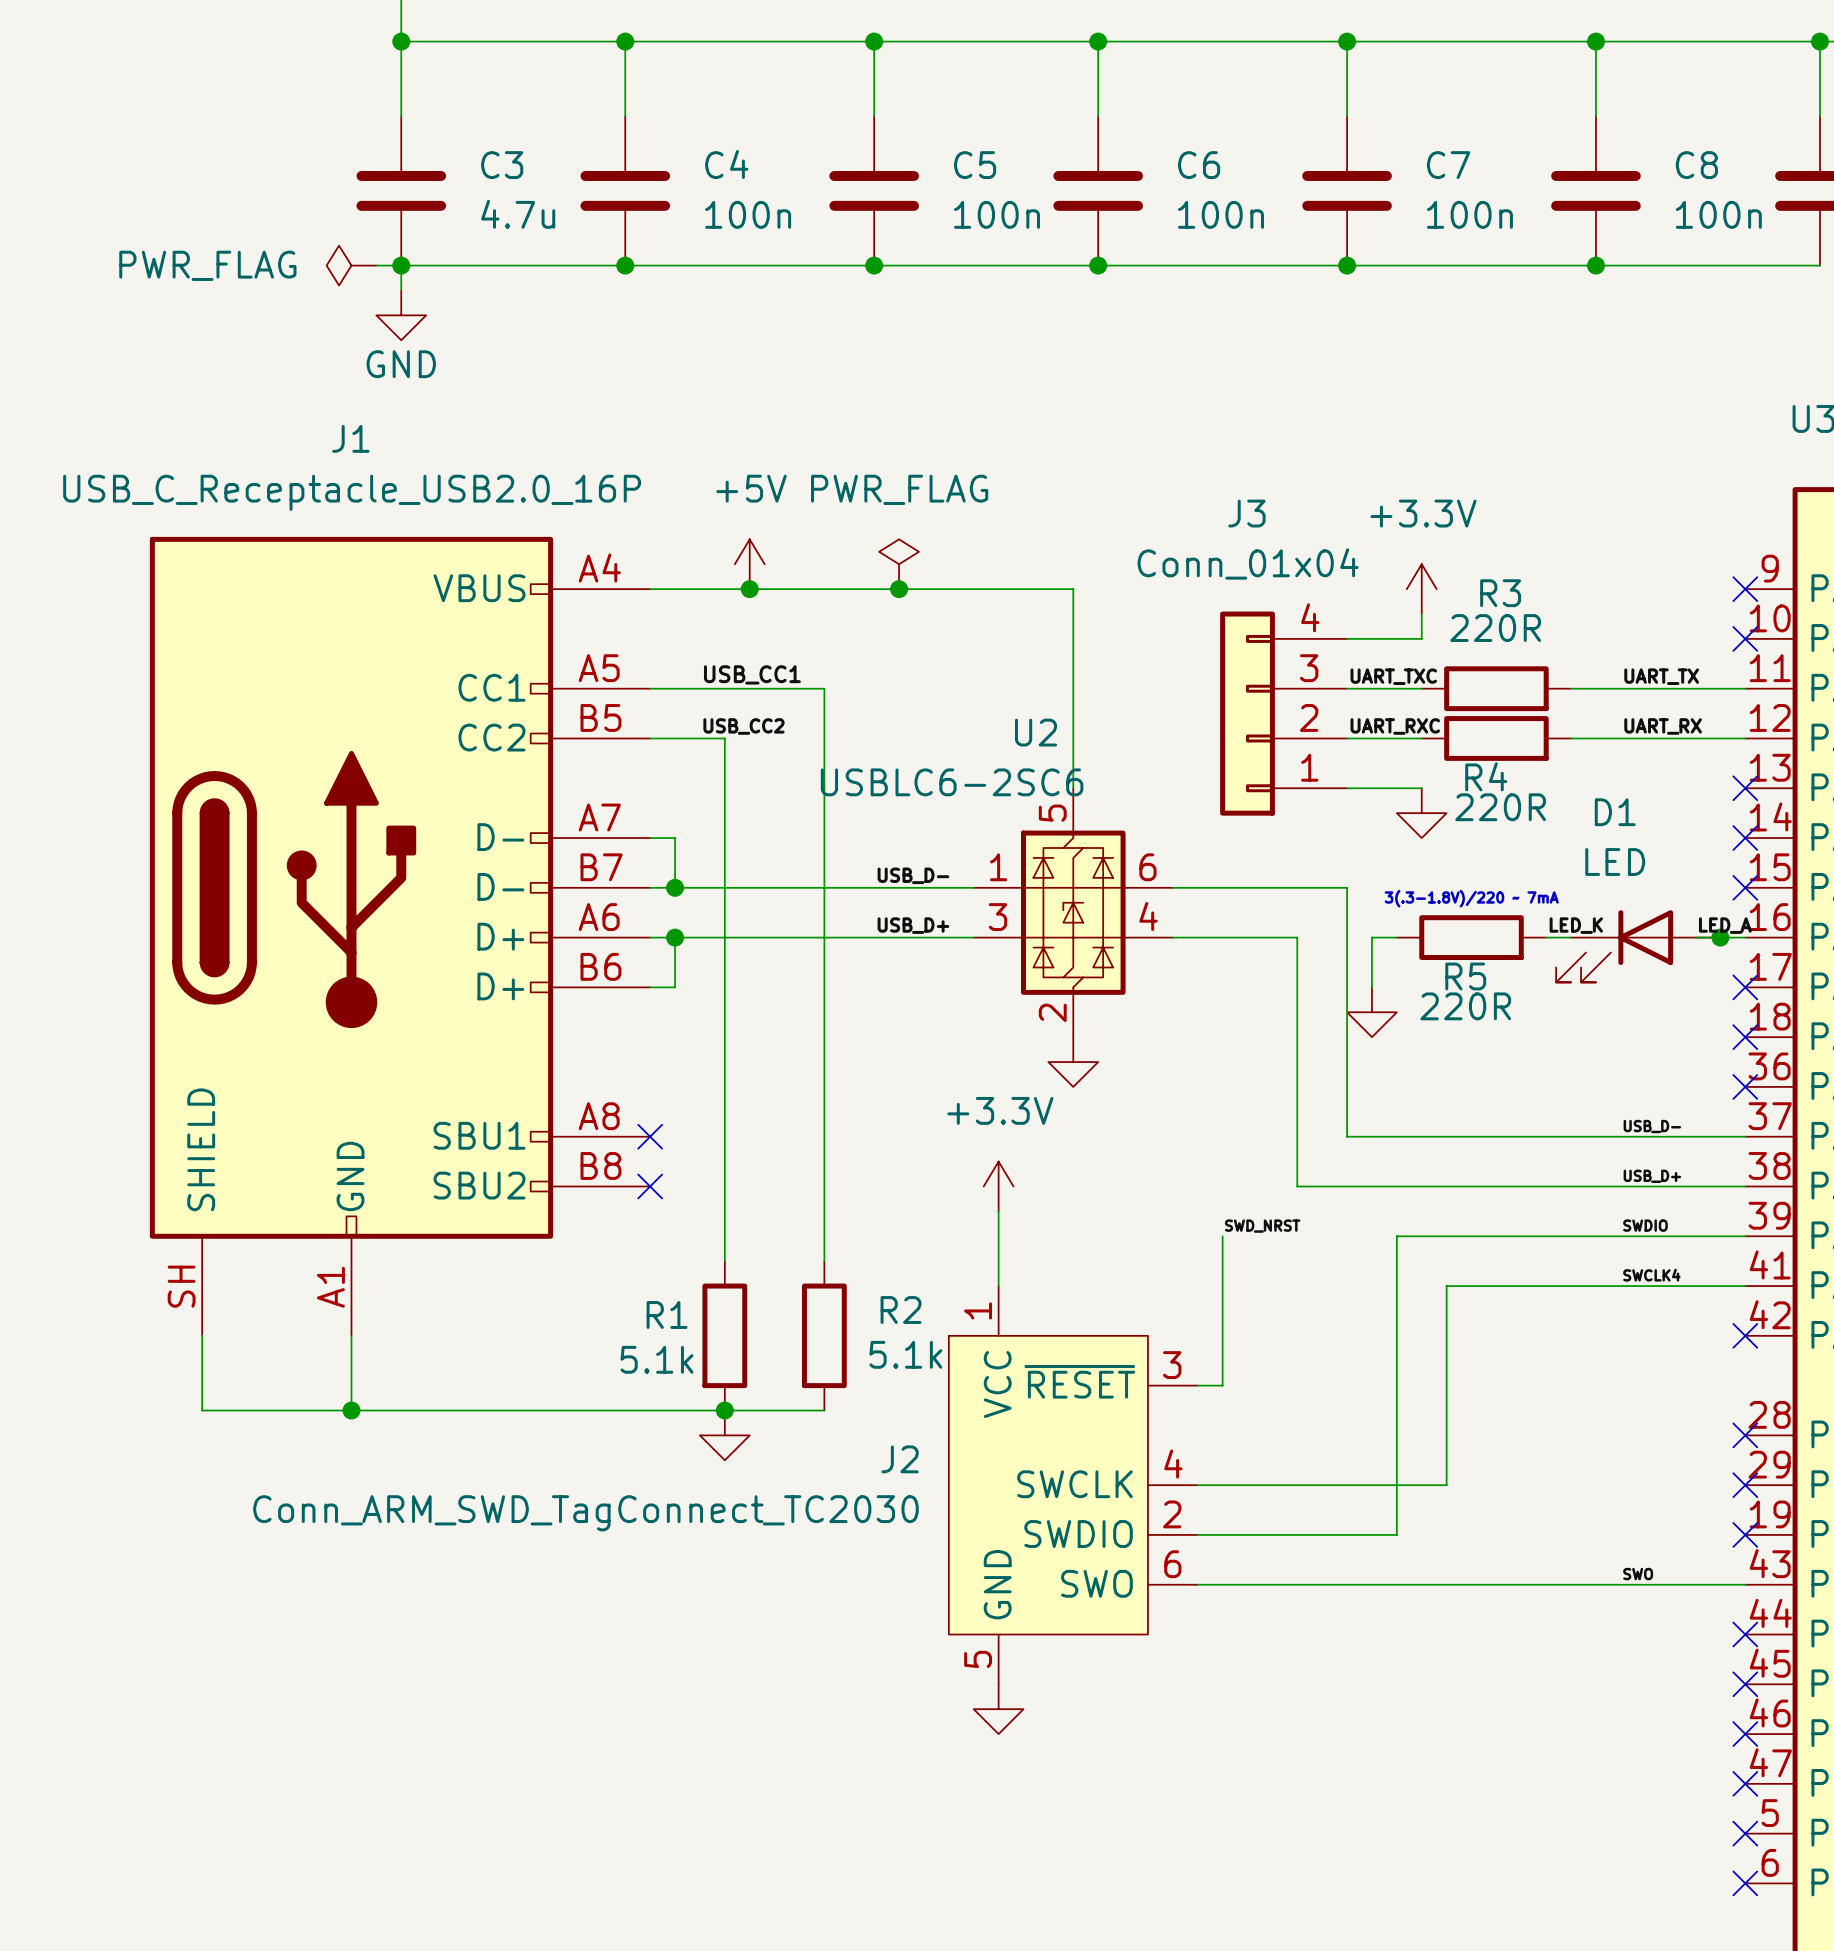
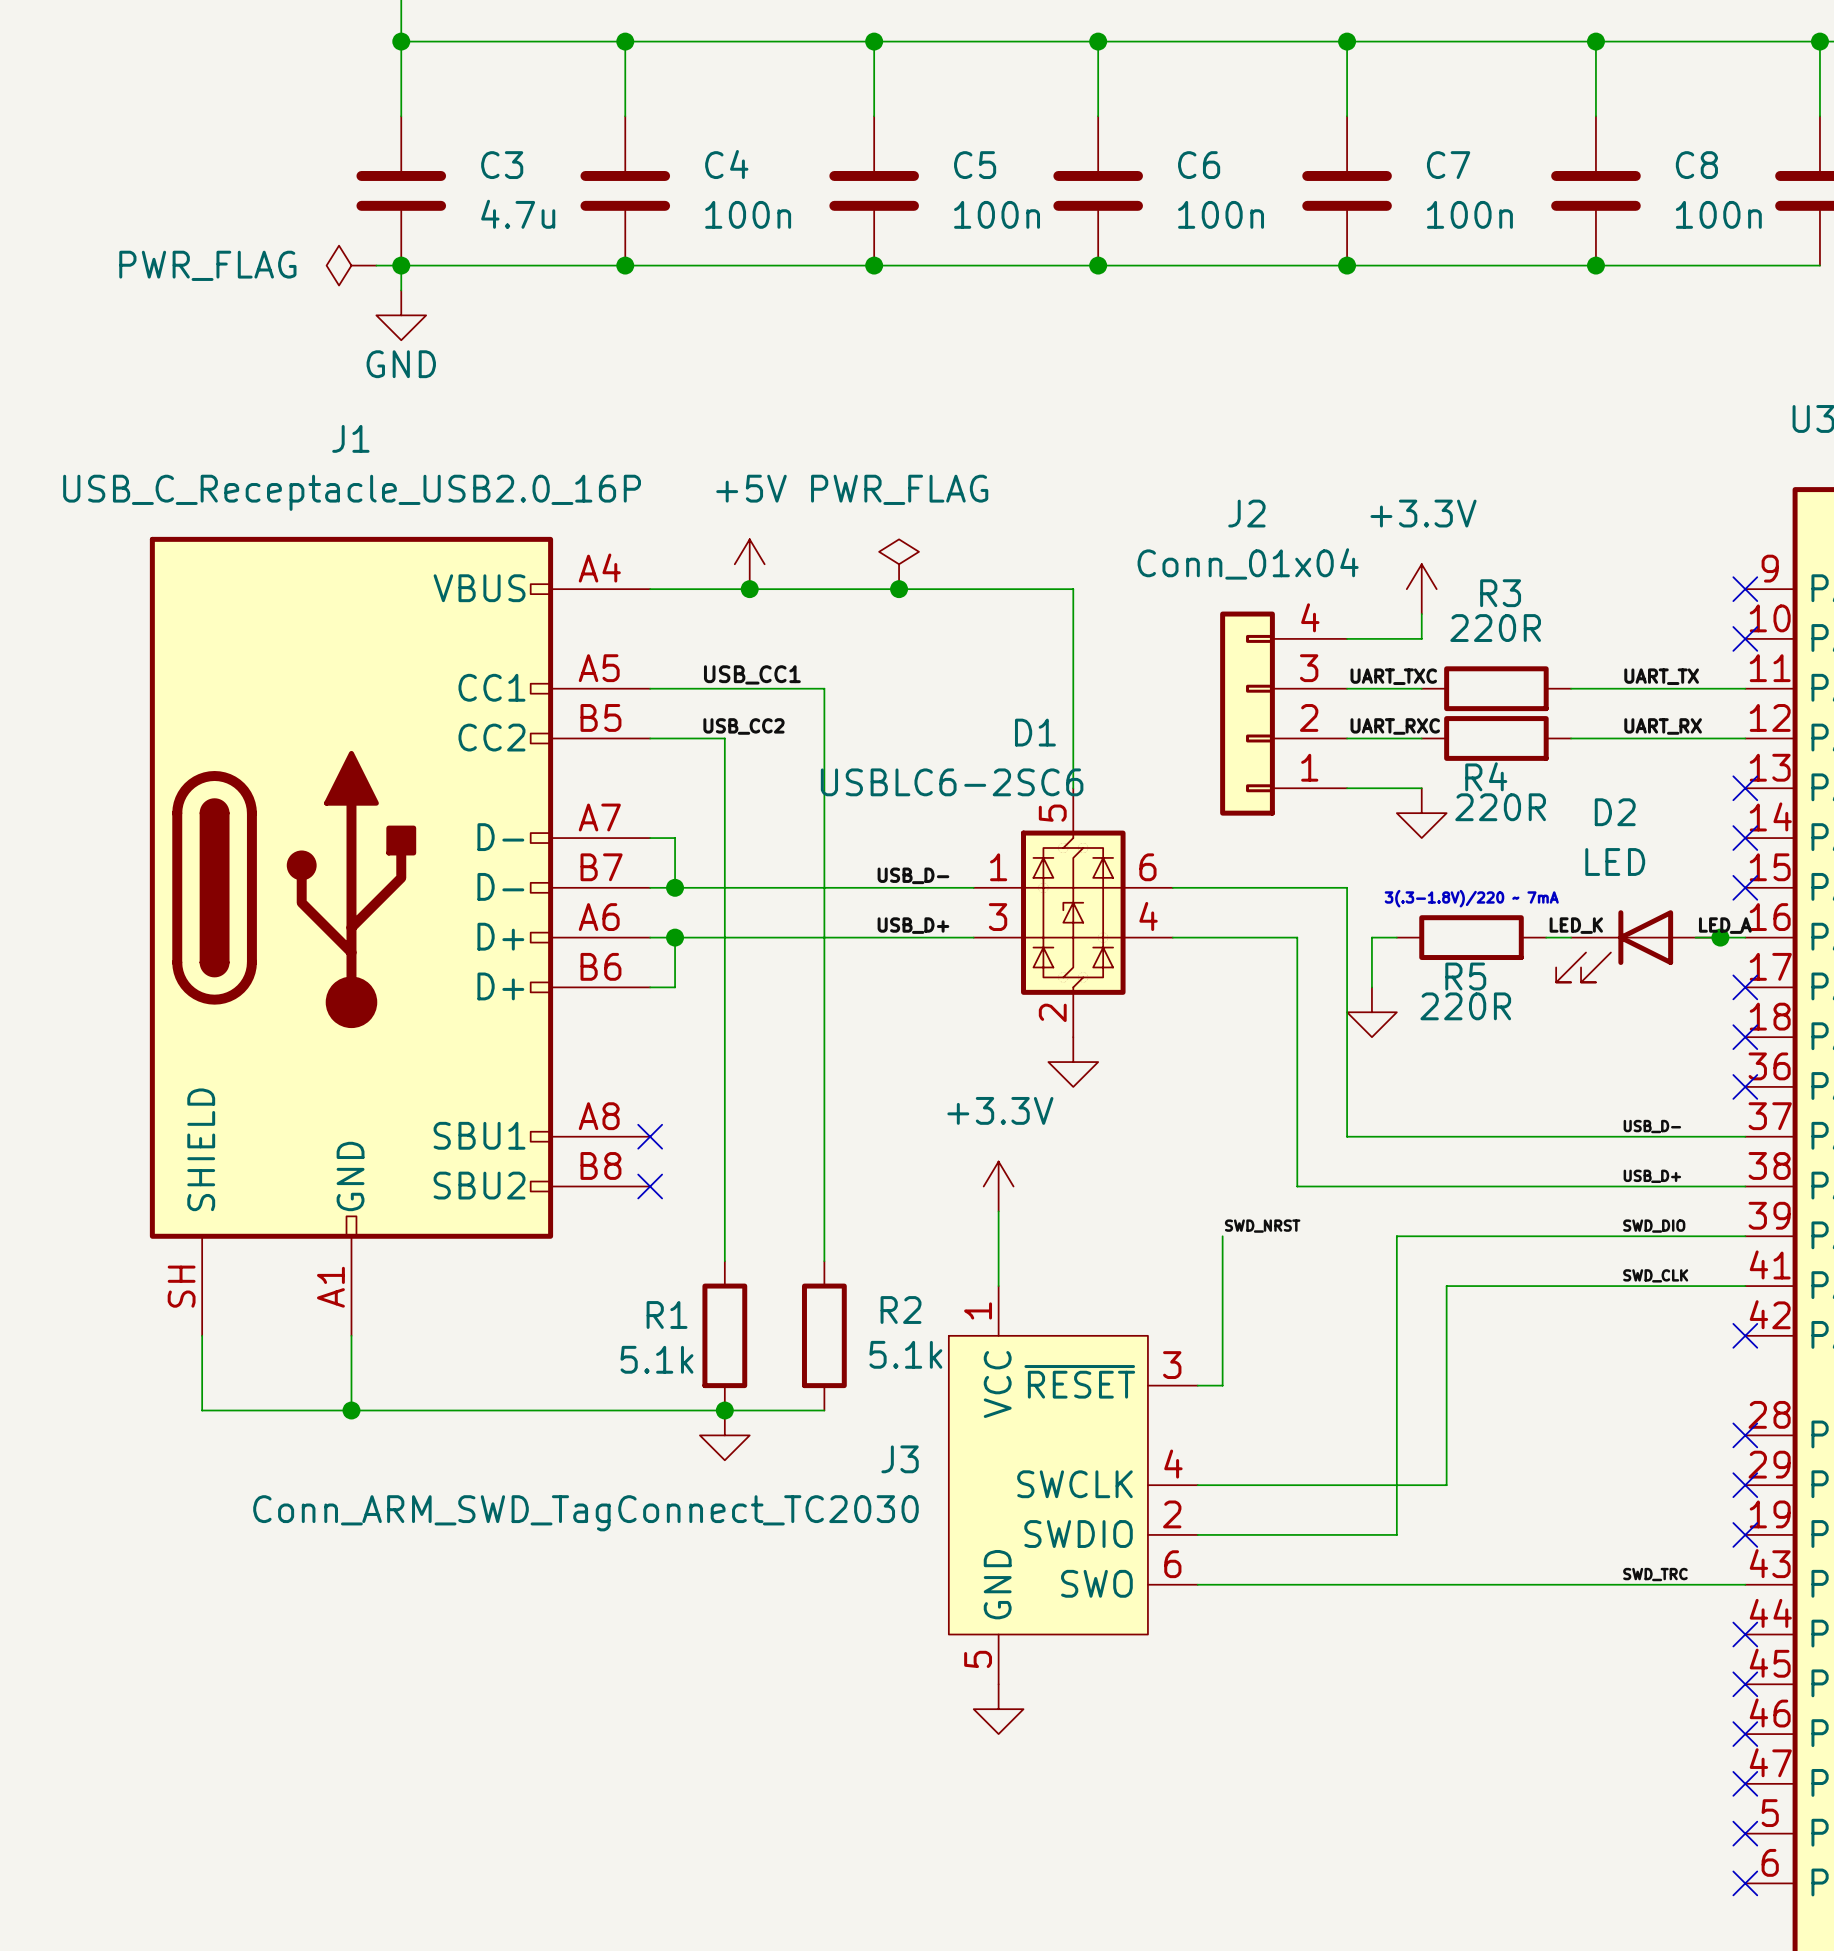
J3 name: J3 (1246, 513) -> J2 (1246, 513)
U2 name: U2 (1036, 732) -> D1 (1035, 732)
D1 name: D1 (1615, 812) -> D2 (1615, 812)
label: SWDIO (1645, 1225) -> SWD_DIO (1654, 1226)
label: SWCLK4 (1651, 1275) -> SWD_CLK (1655, 1275)
J2 name: J2 (900, 1459) -> J3 (900, 1459)
label: SWO (1638, 1574) -> SWD_TRC (1655, 1574)

